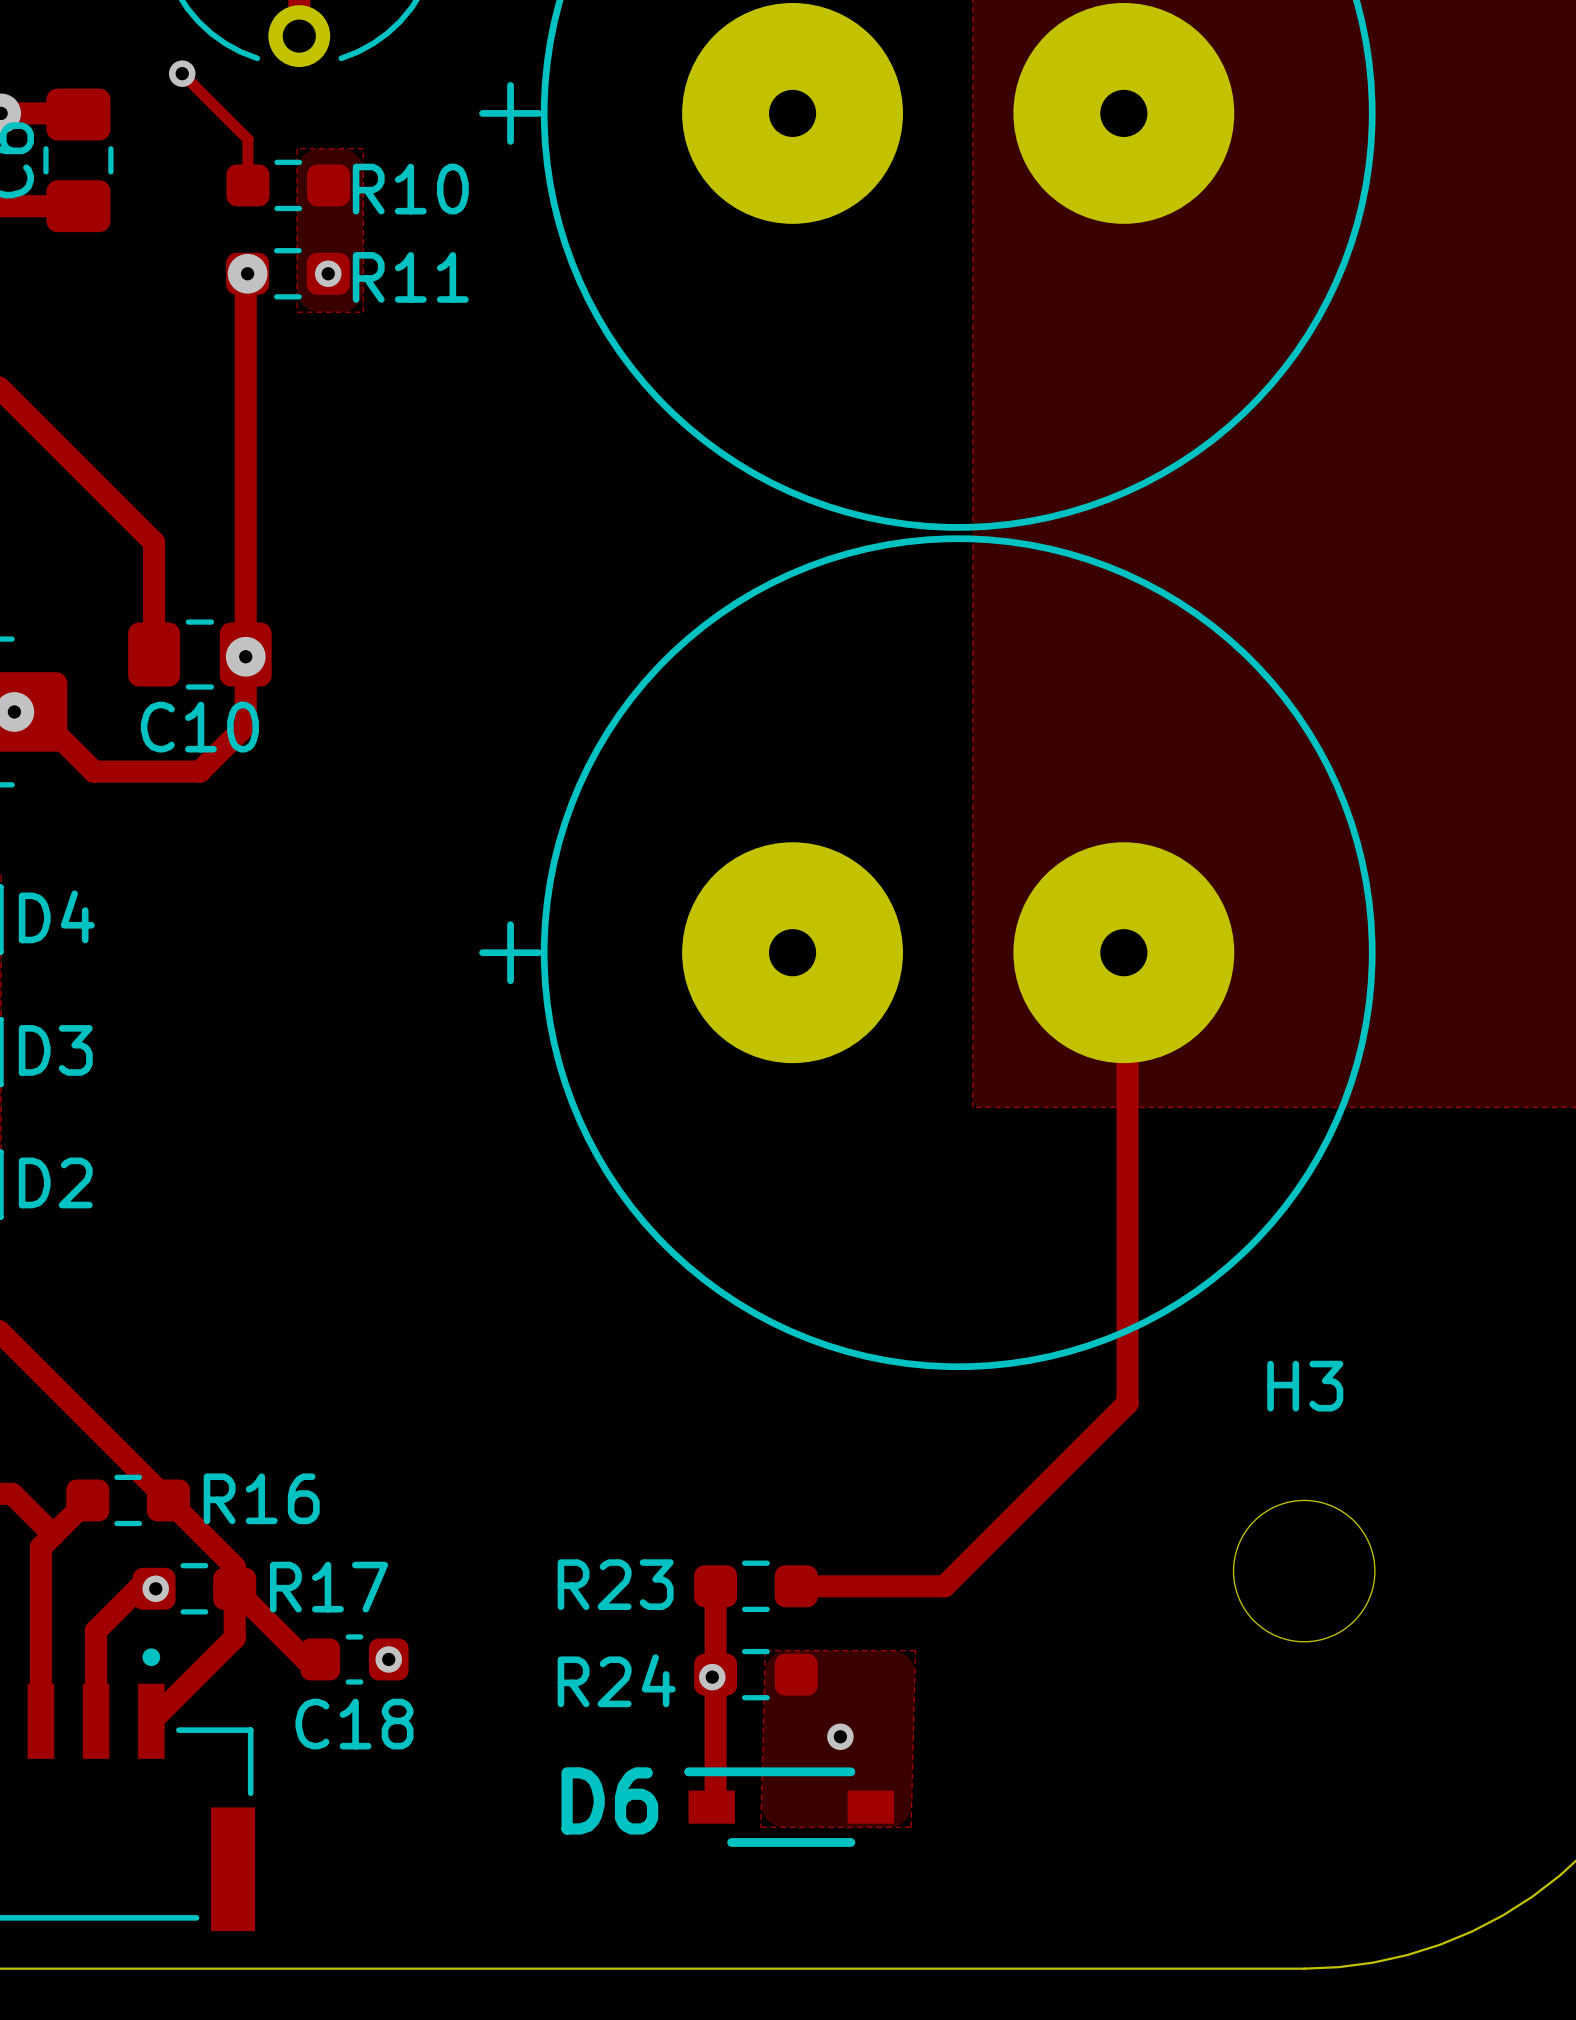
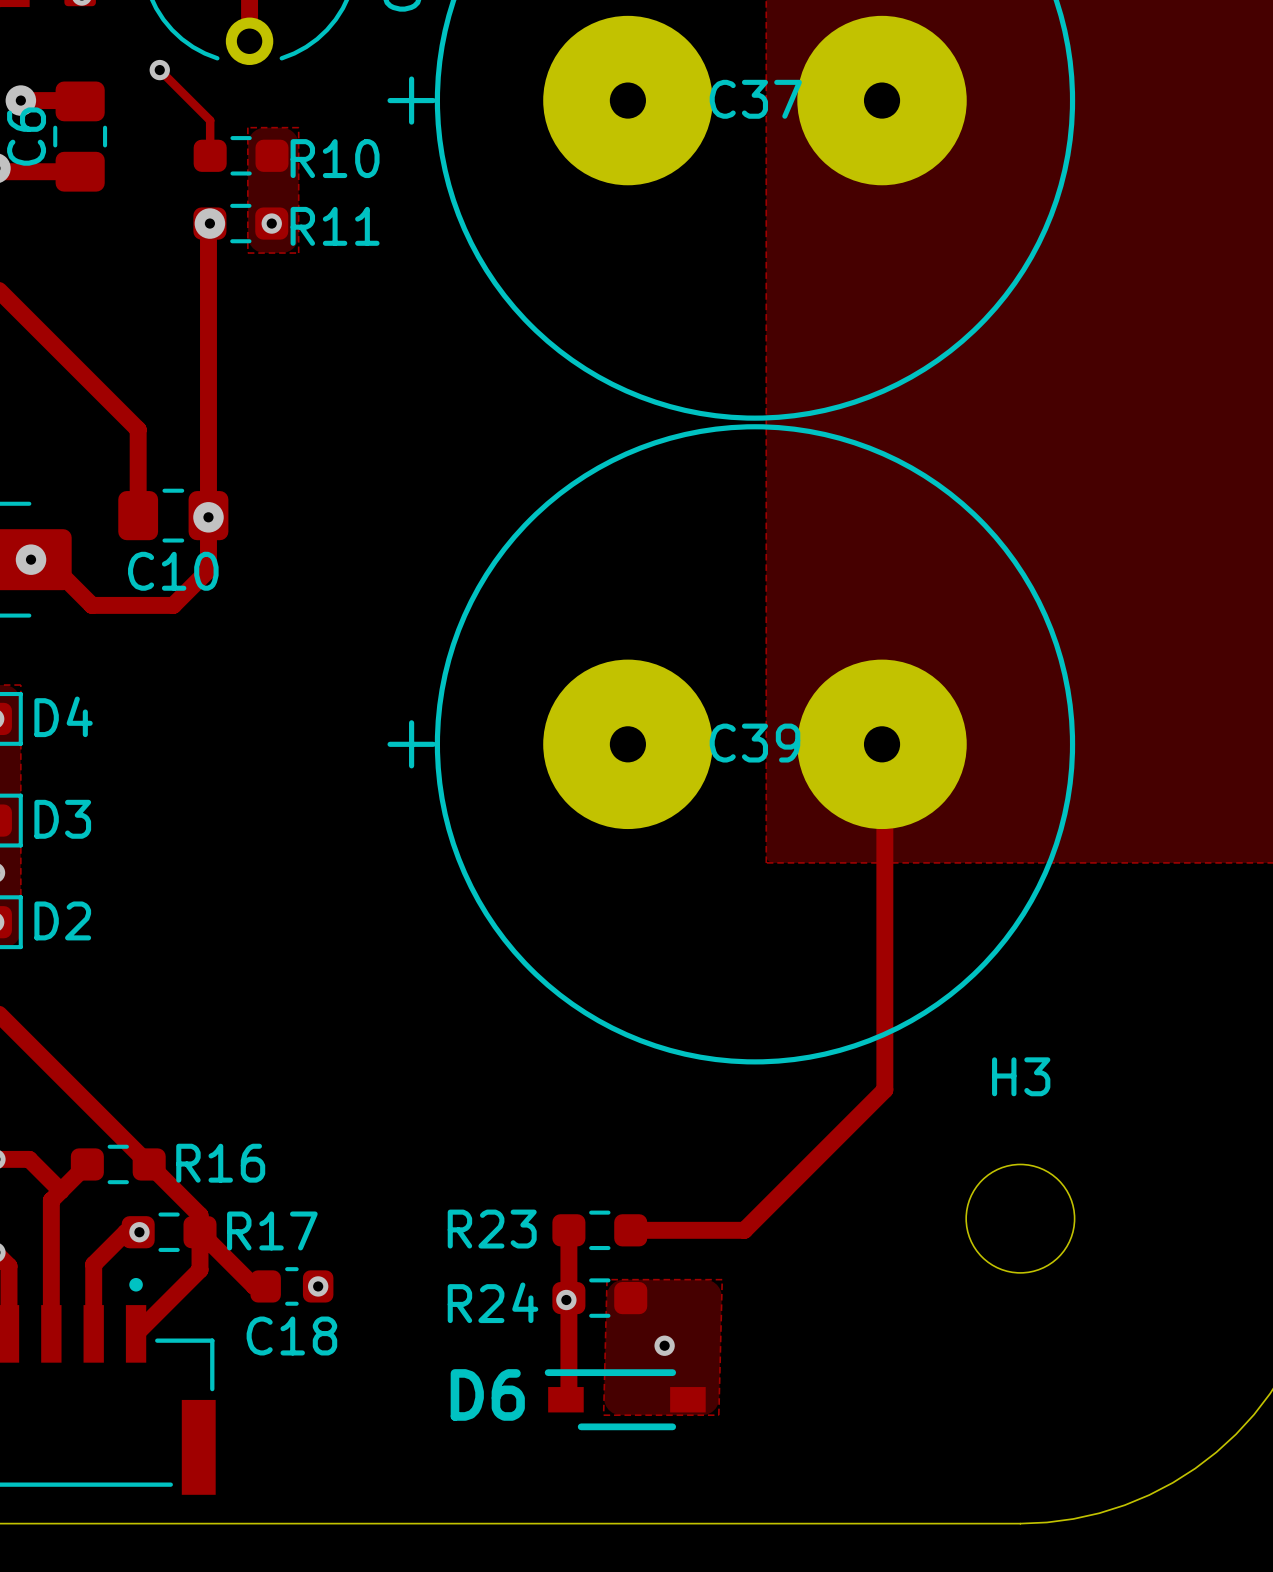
C37 name: none -> C37 (755, 99)
C39 name: none -> C39 (754, 743)

